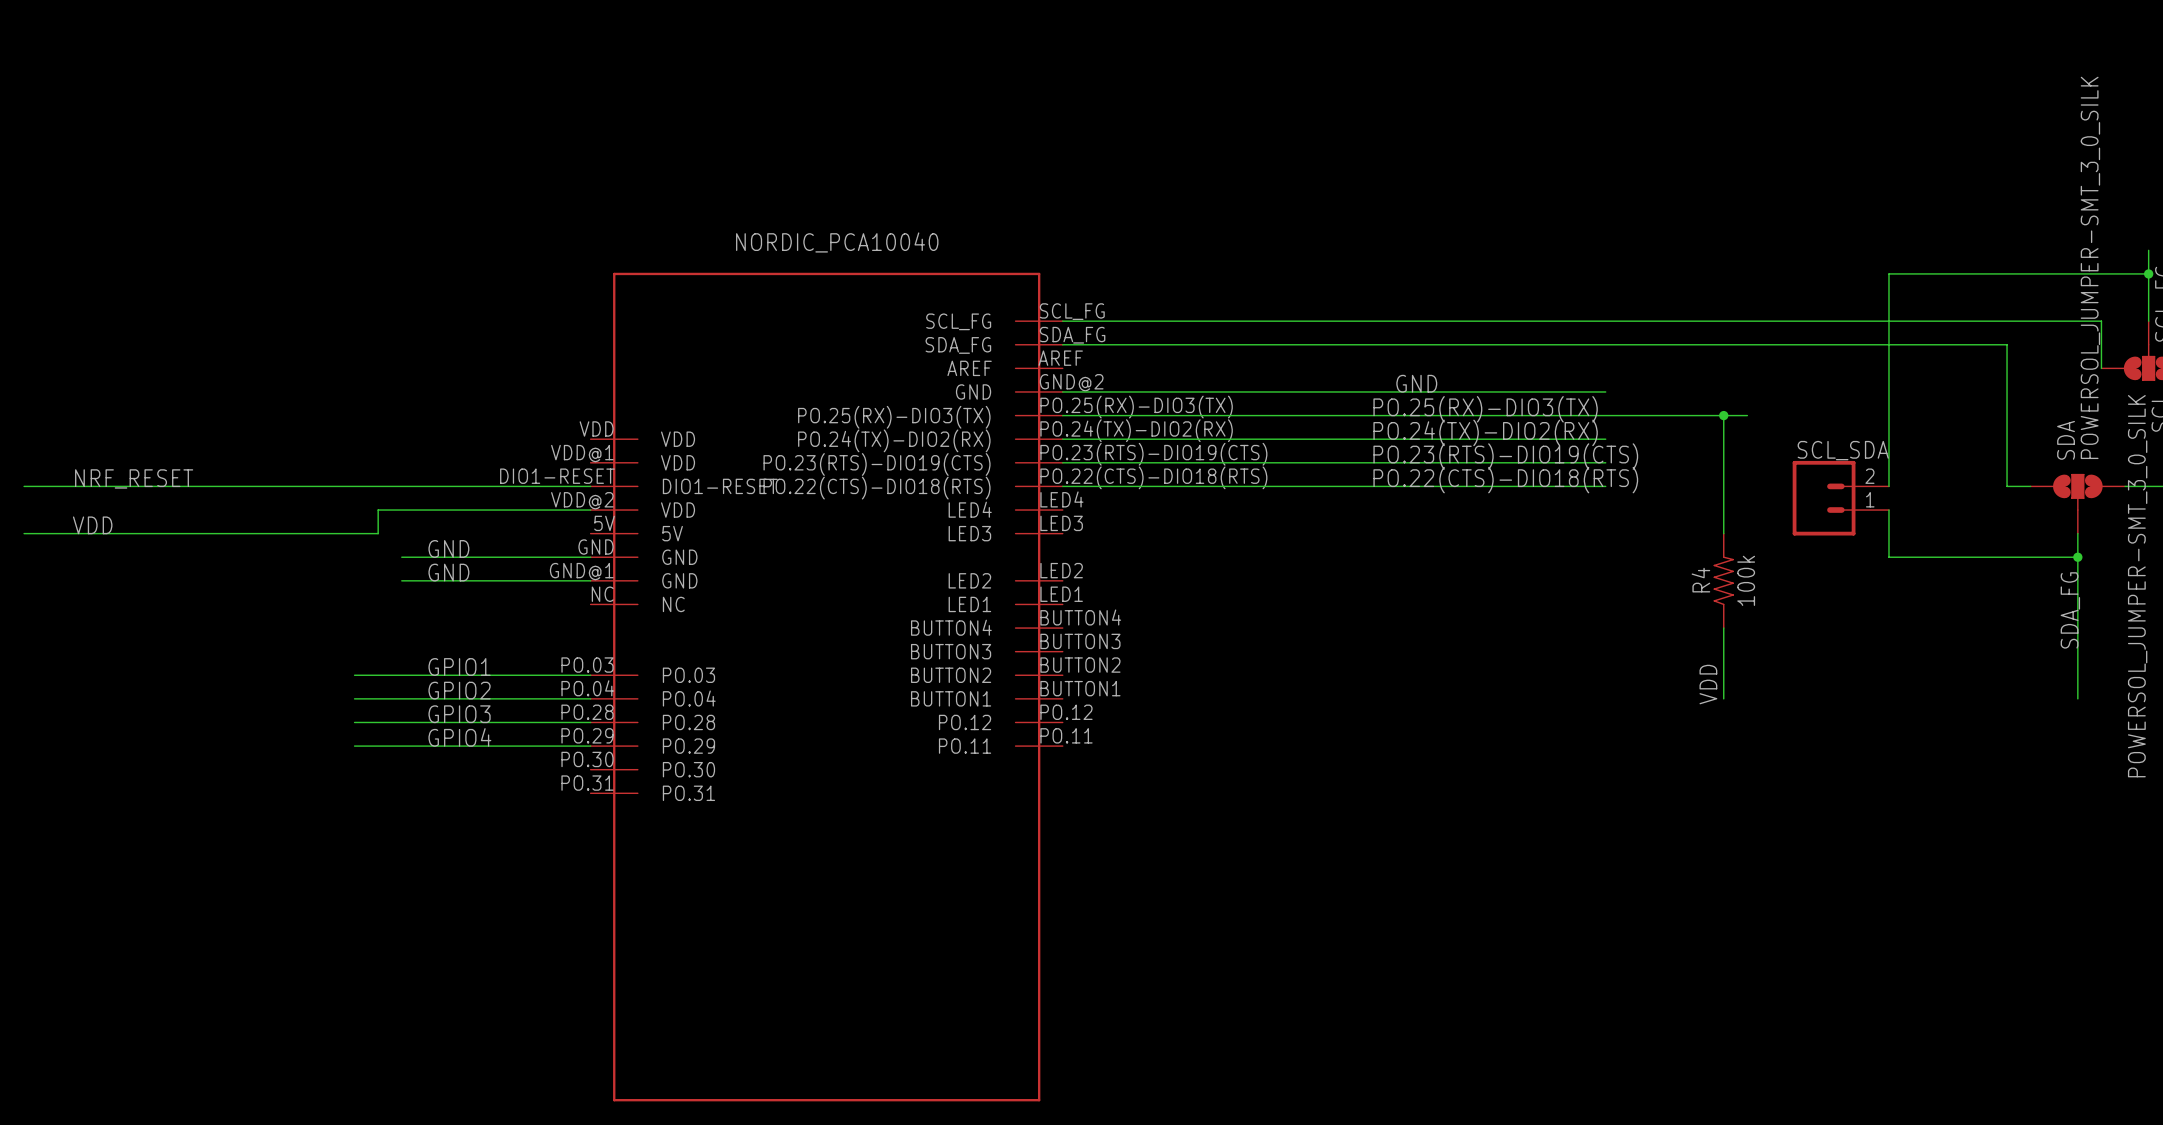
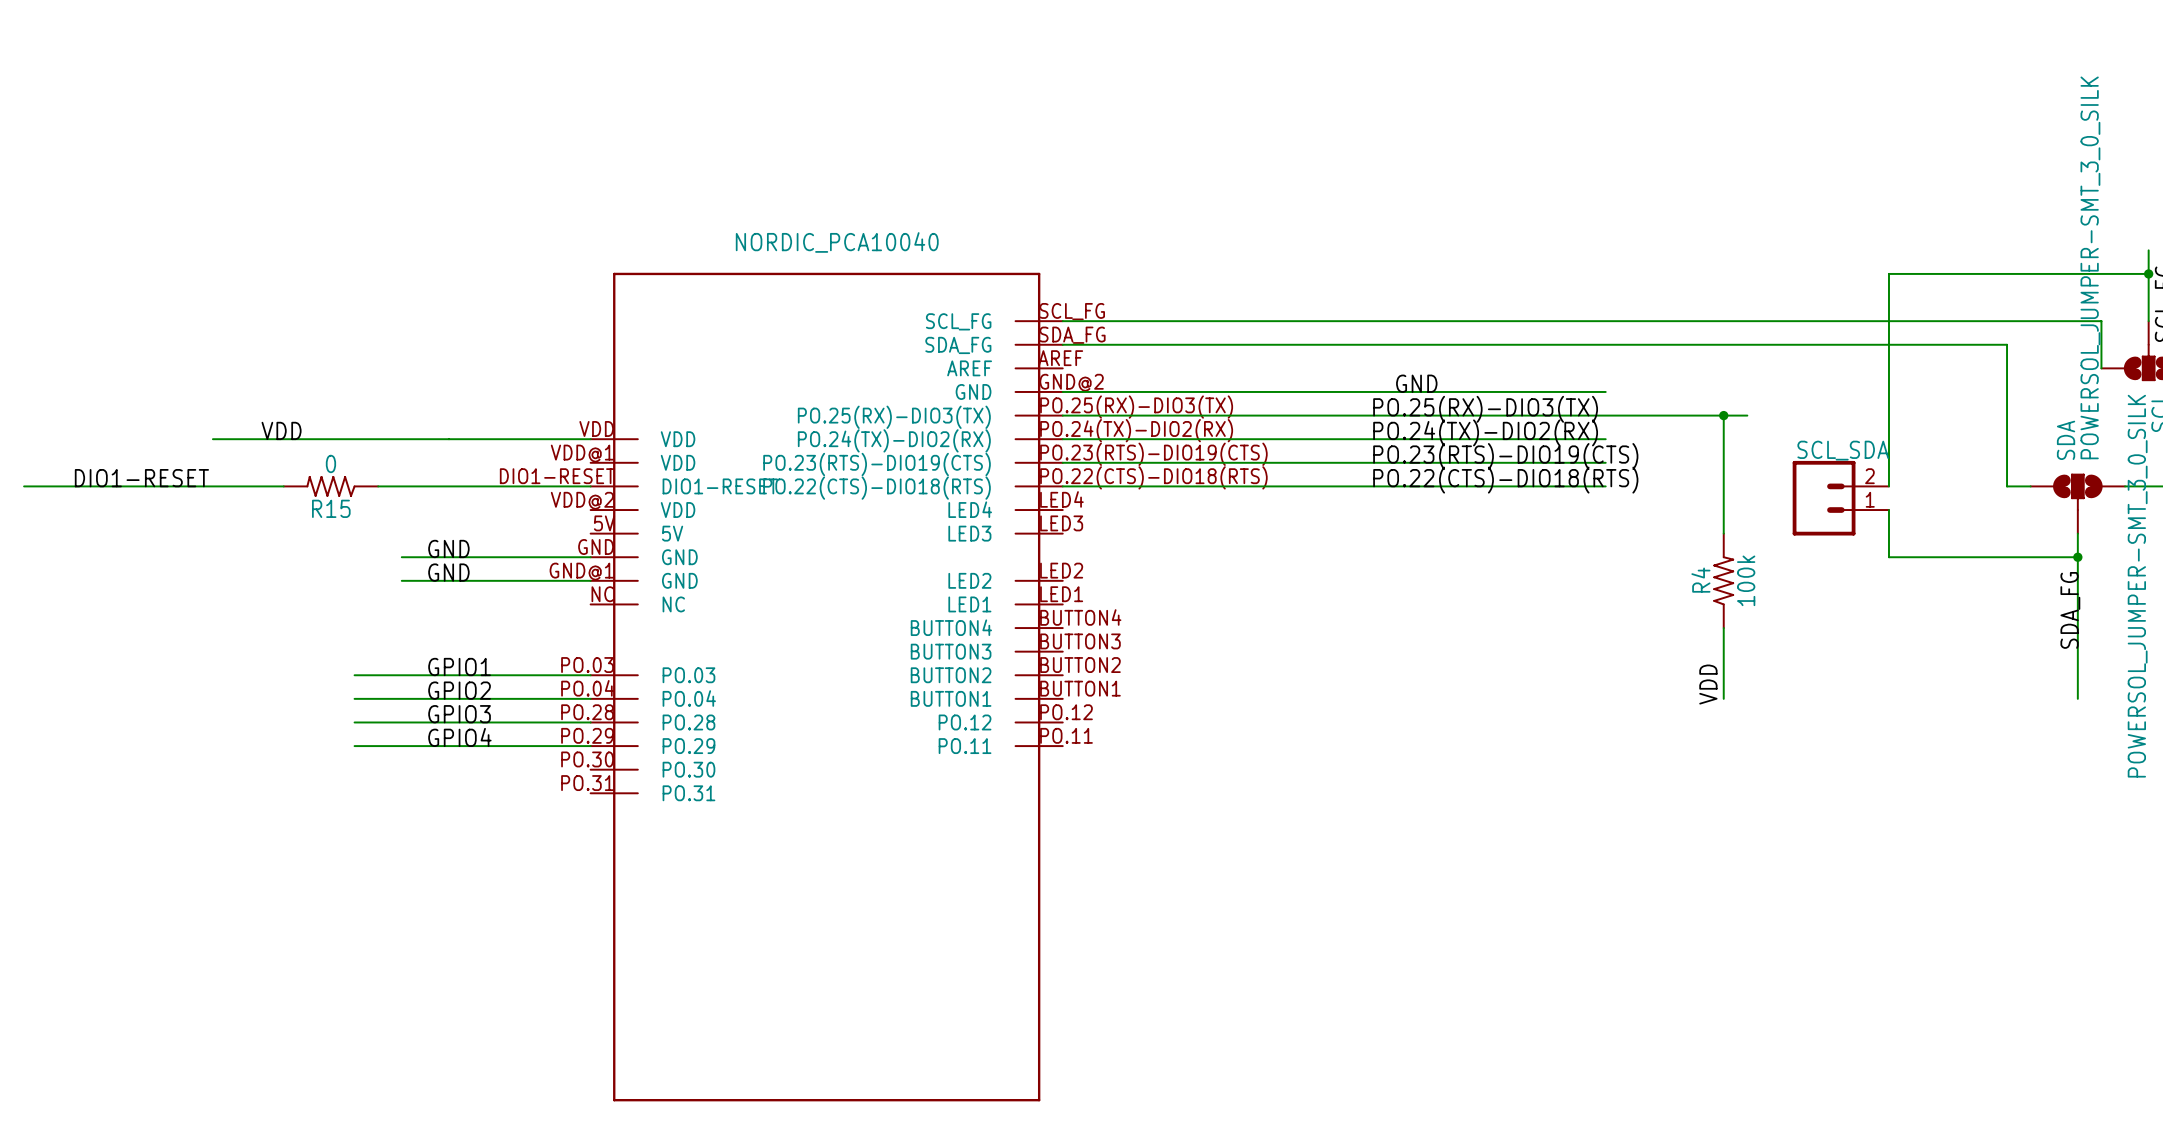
wire: none -> (212, 439) (590, 439)
label: NRF_RESET (134, 478) -> DIO1-RESET (141, 478)
R15: none -> 0 (330, 486)
wire: (590, 510) (378, 510) (378, 533) (24, 533) -> none
label position: VDD (92, 525) -> VDD (281, 430)

